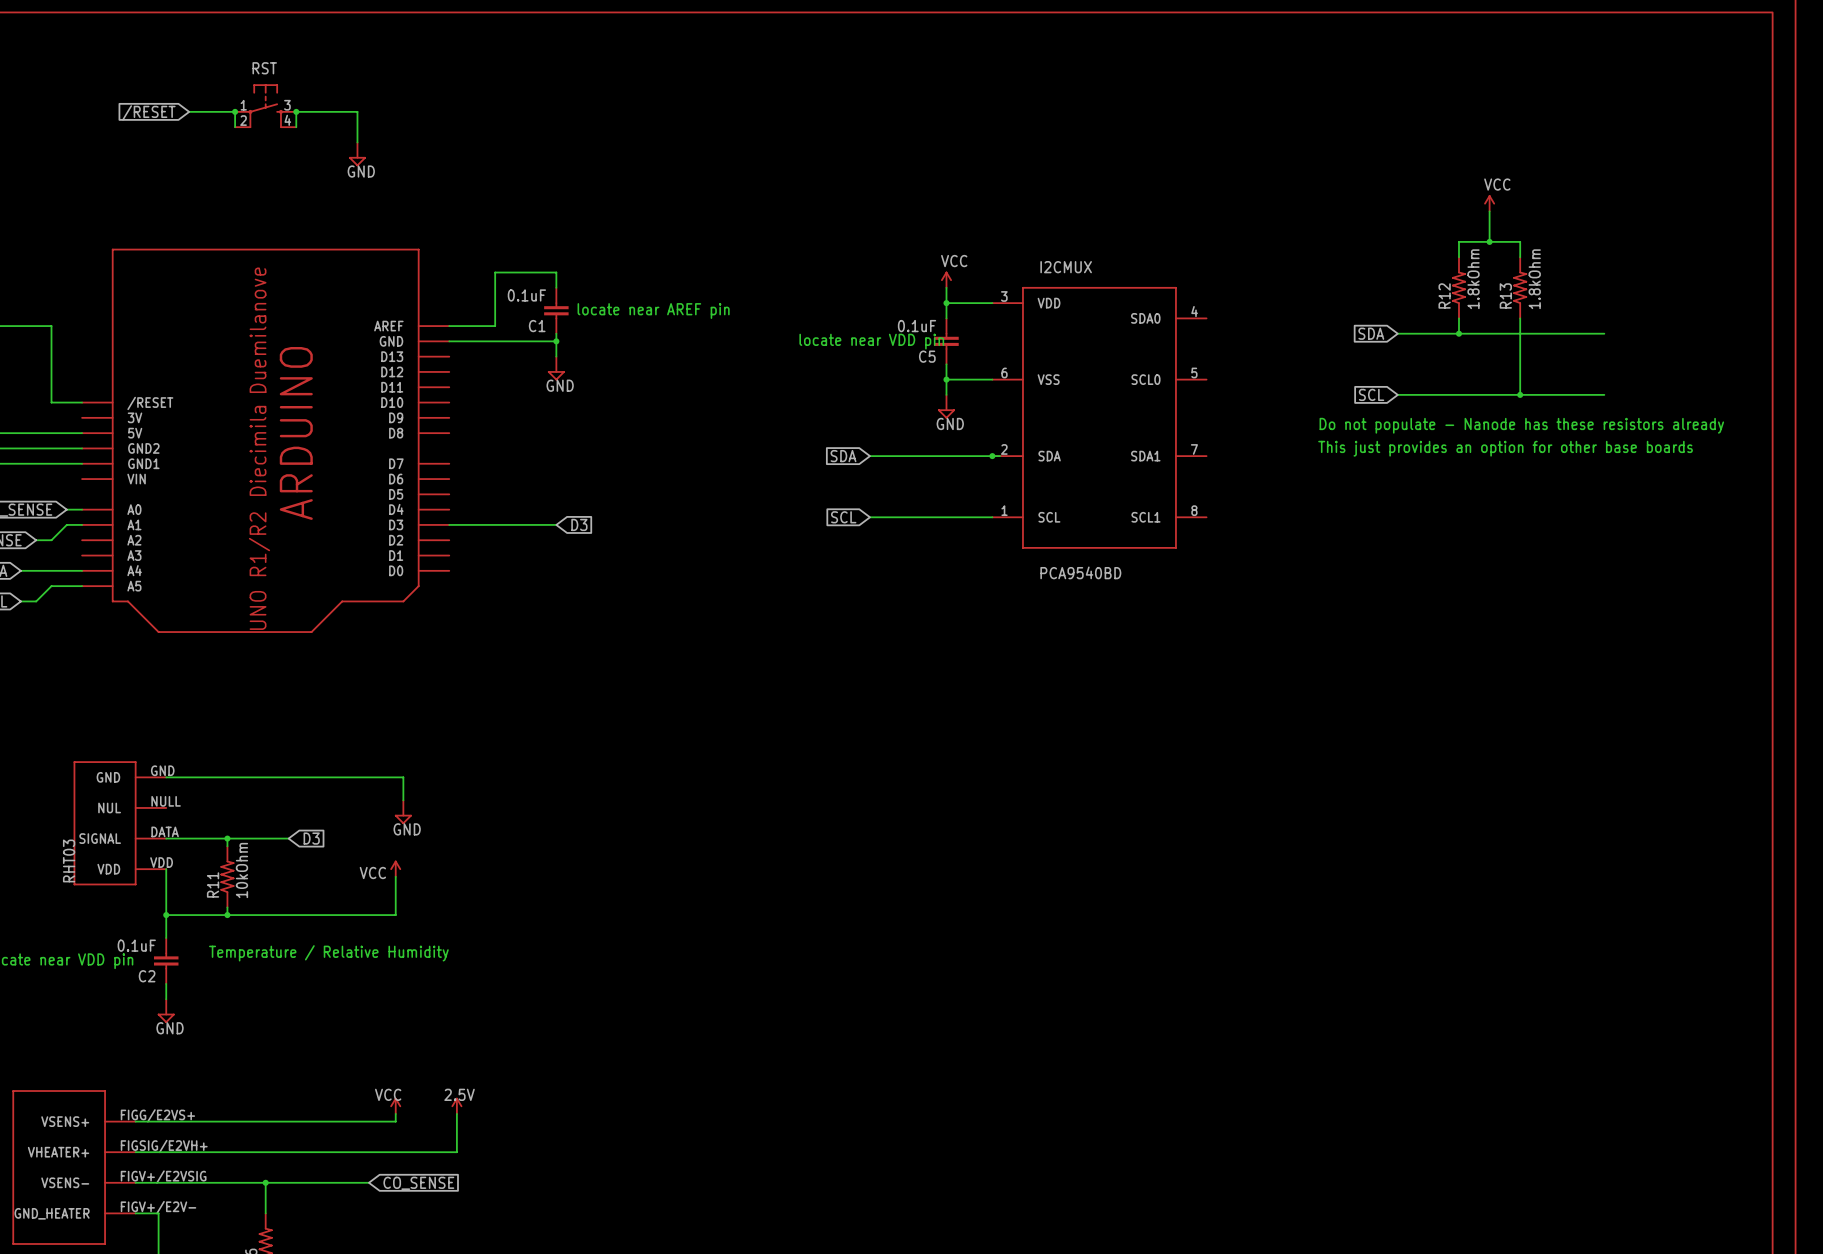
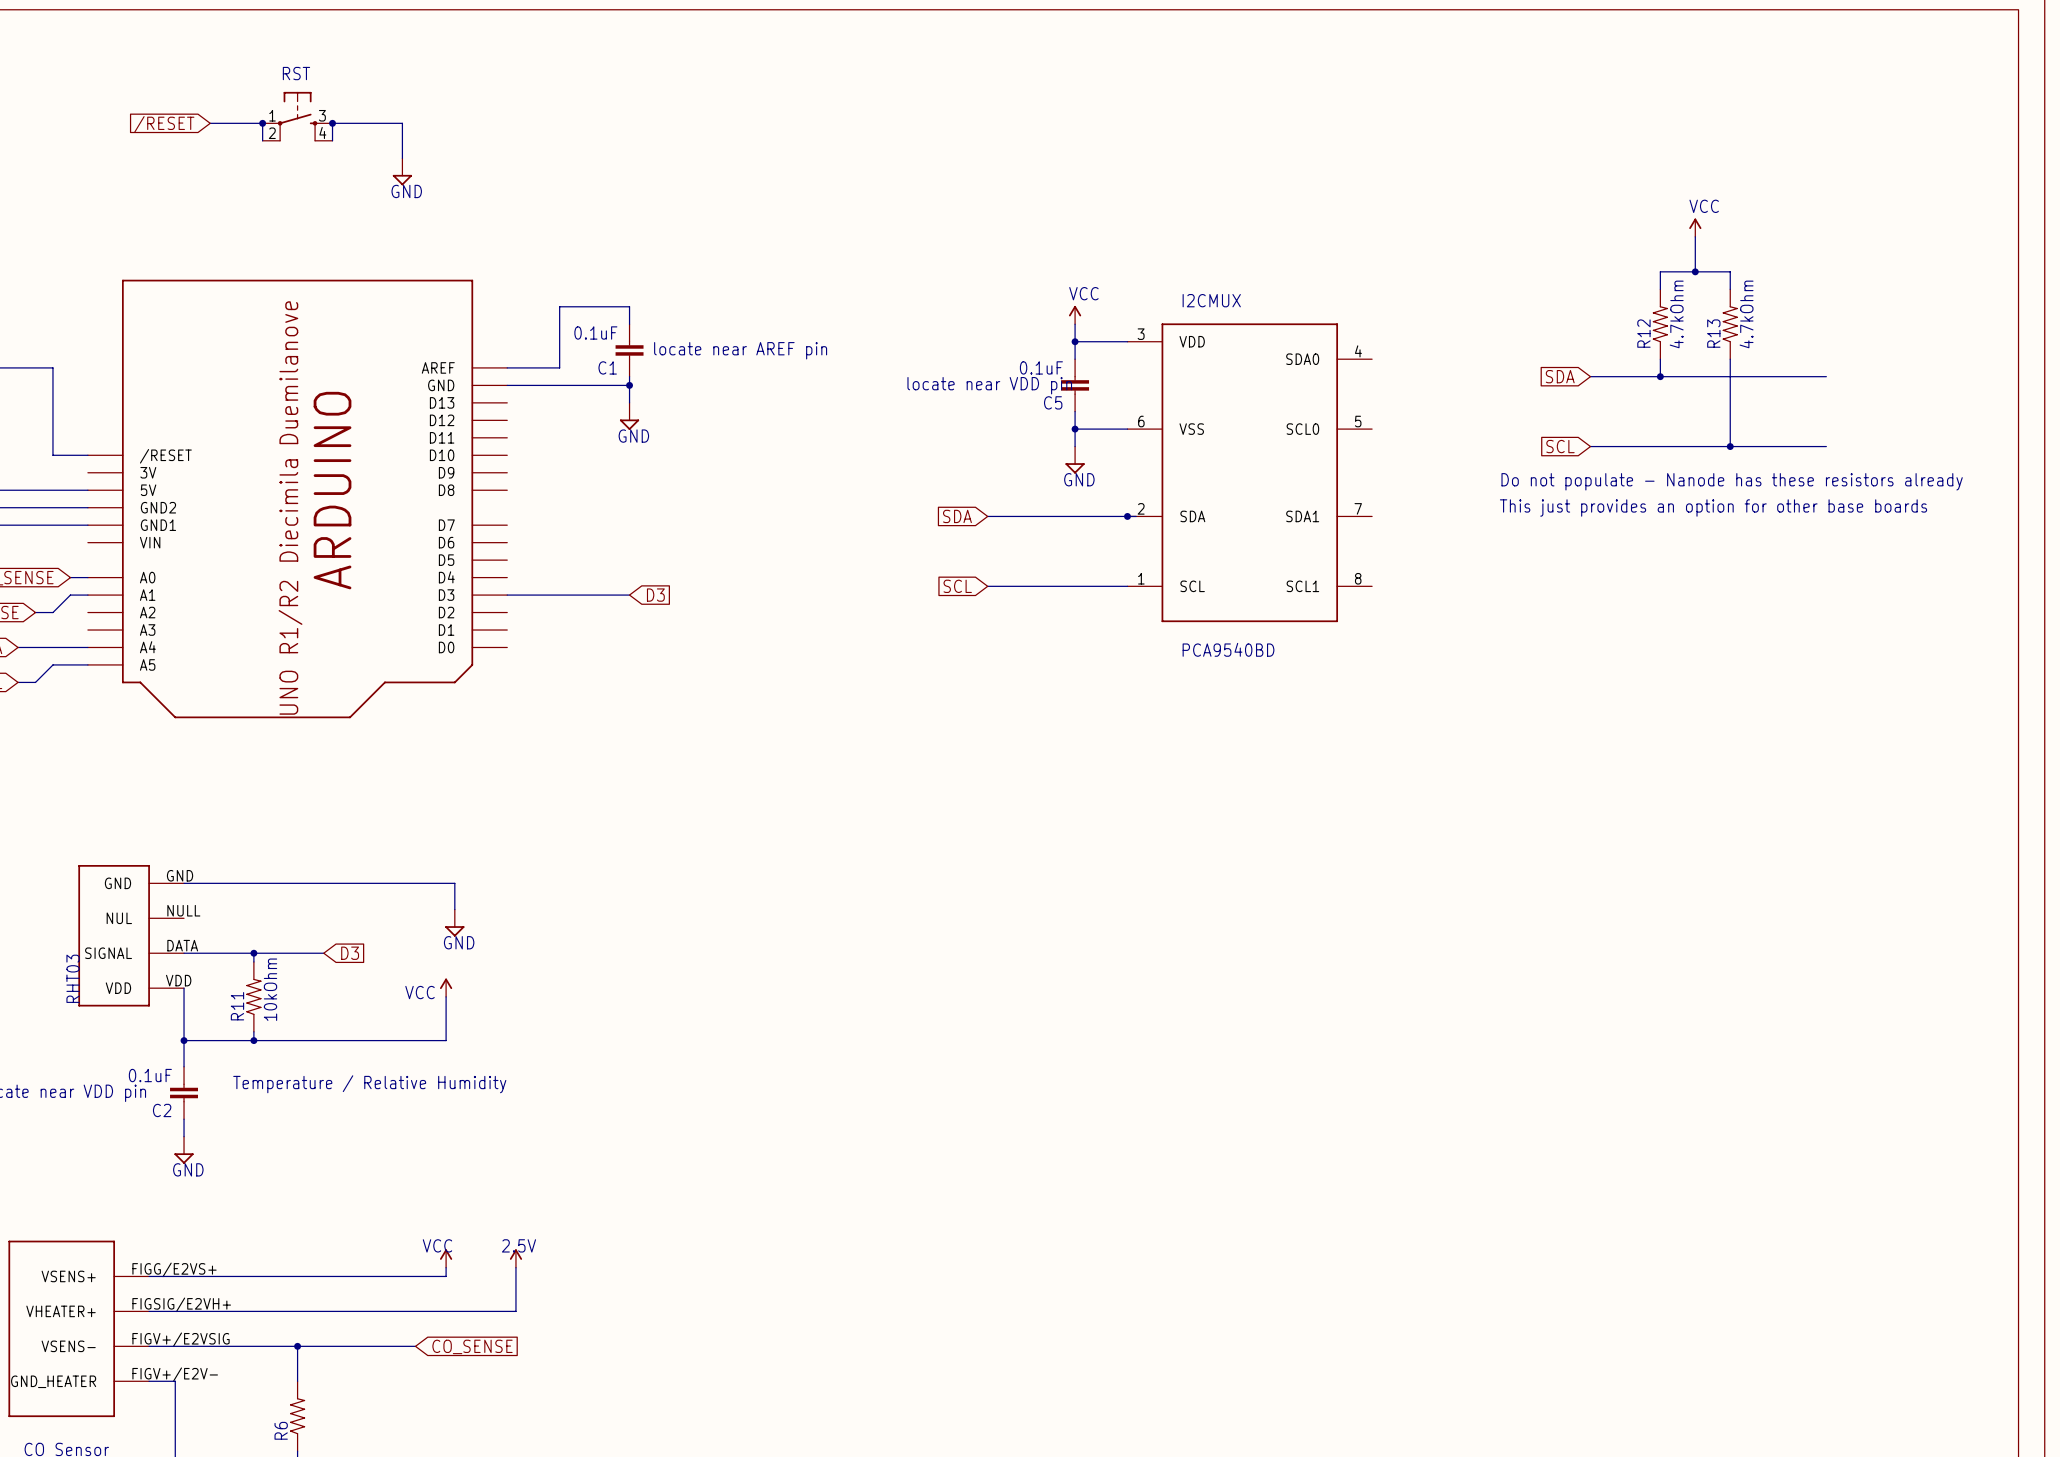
R12 value: 1.8kOhm (1473, 279) -> 4.7kOhm (1676, 314)
R13 value: 1.8kOhm (1534, 279) -> 4.7kOhm (1746, 314)

